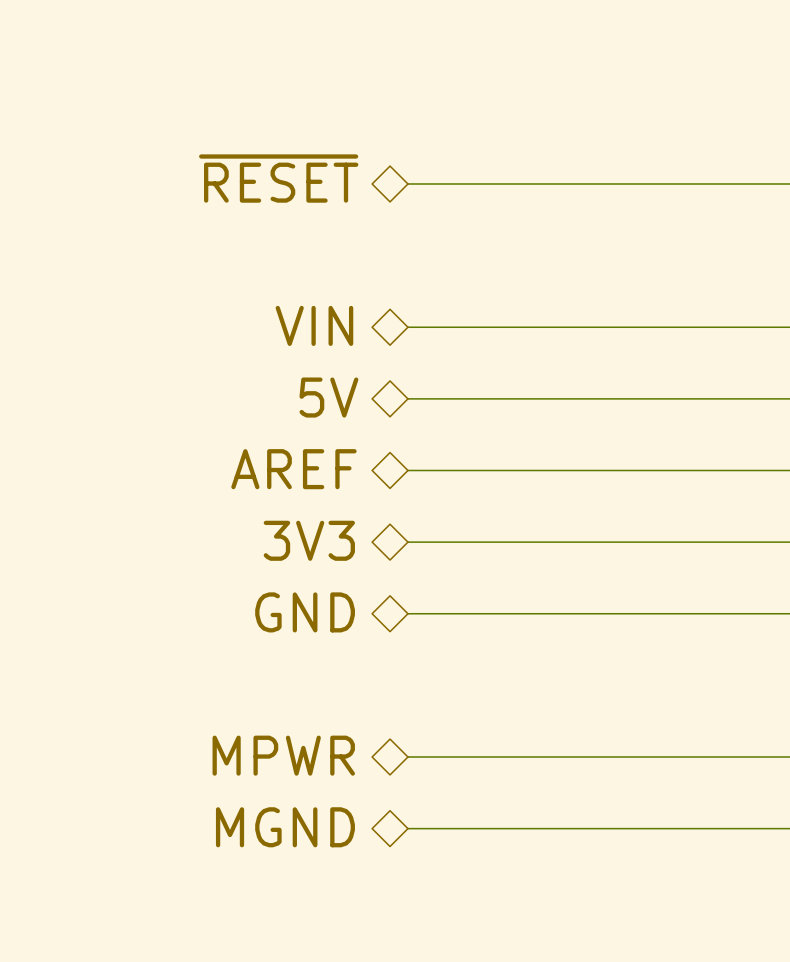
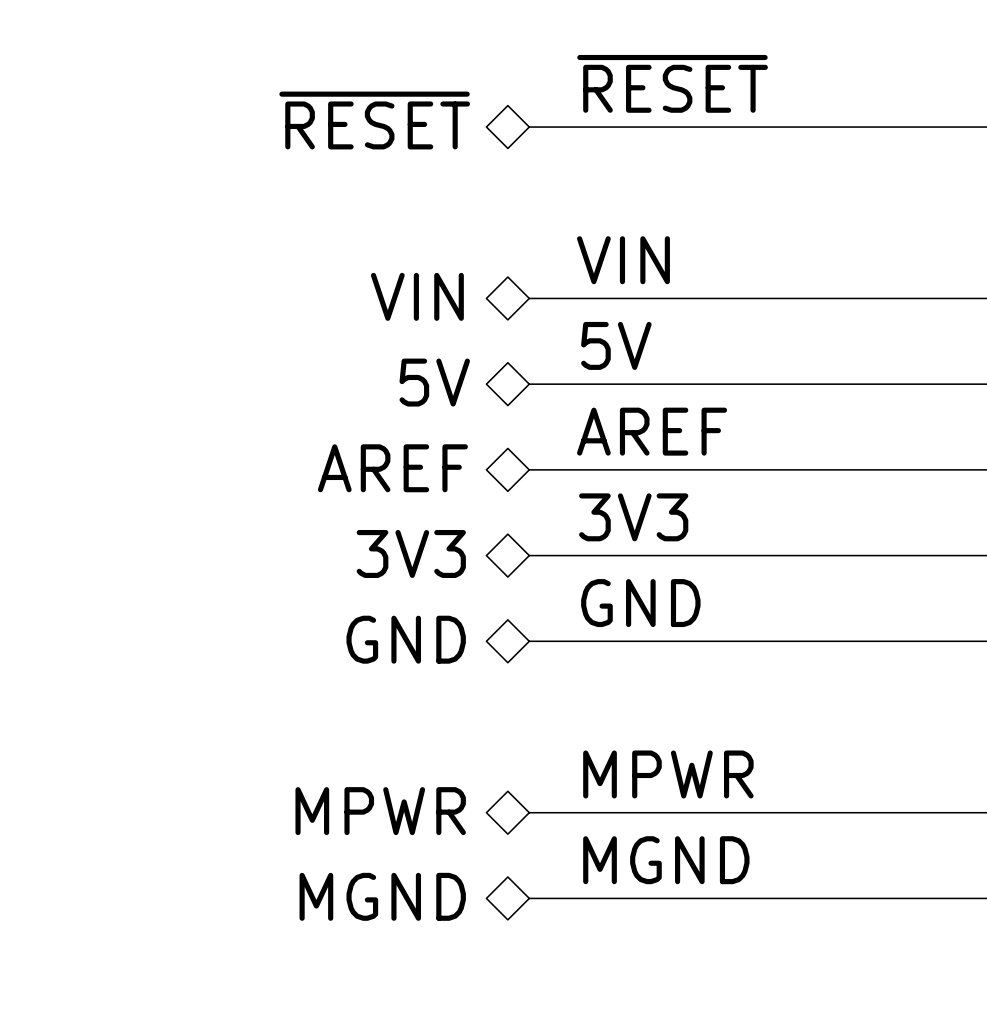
label: none -> ~{RESET} (672, 83)
label: none -> VIN (623, 260)
label: none -> 5V (616, 345)
label: none -> AREF (652, 431)
label: none -> 3V3 (633, 517)
label: none -> GND (640, 603)
label: none -> MPWR (668, 774)
label: none -> MGND (666, 860)

